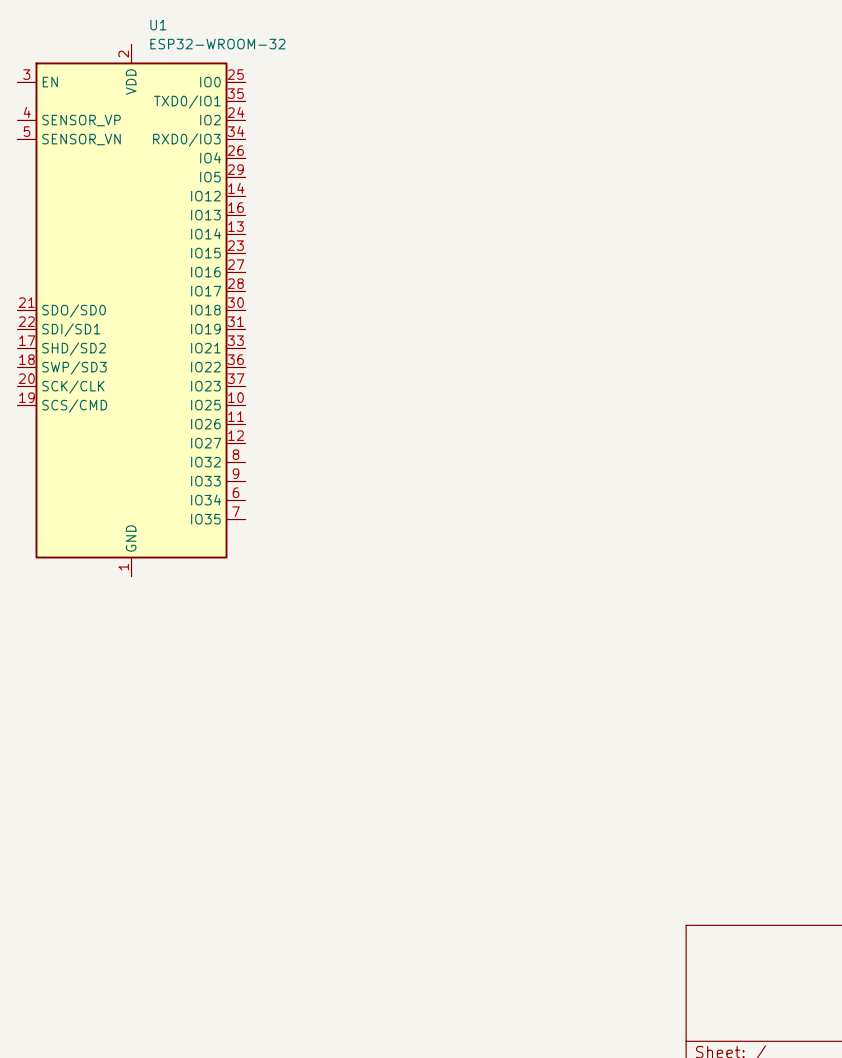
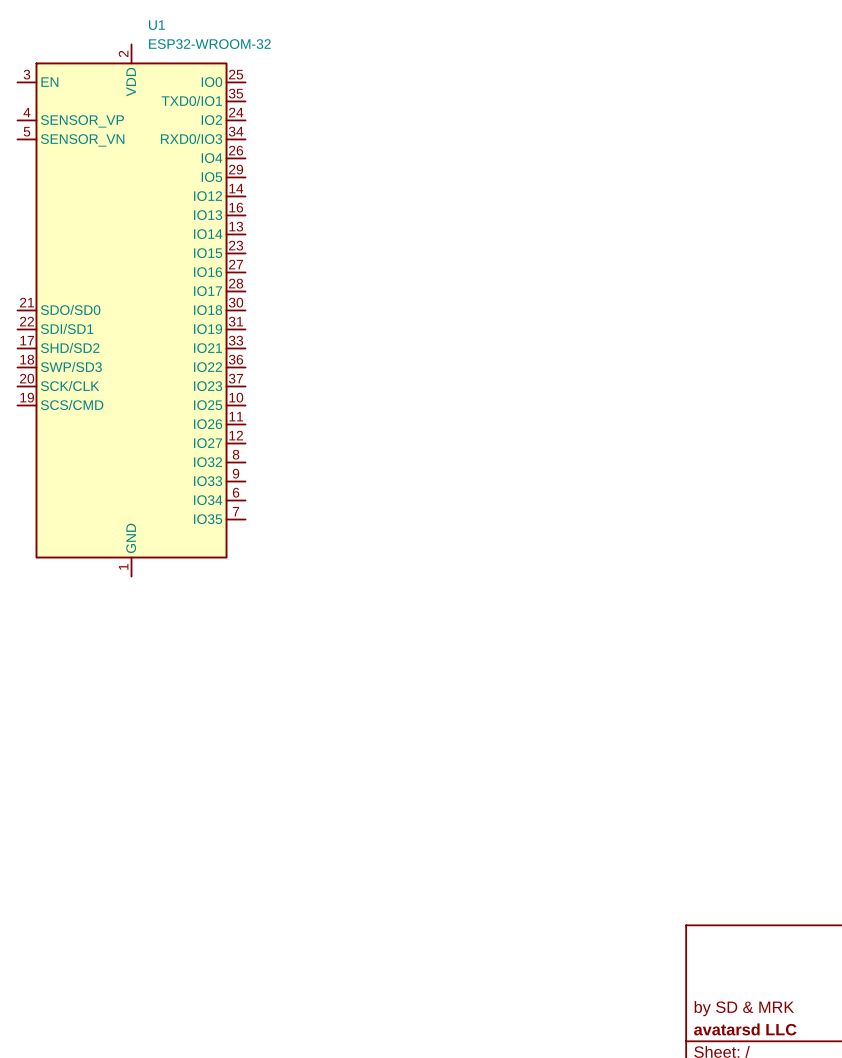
title block: none -> by SD & MRK (744, 1008)
title block: none -> avatarsd LLC (745, 1029)

